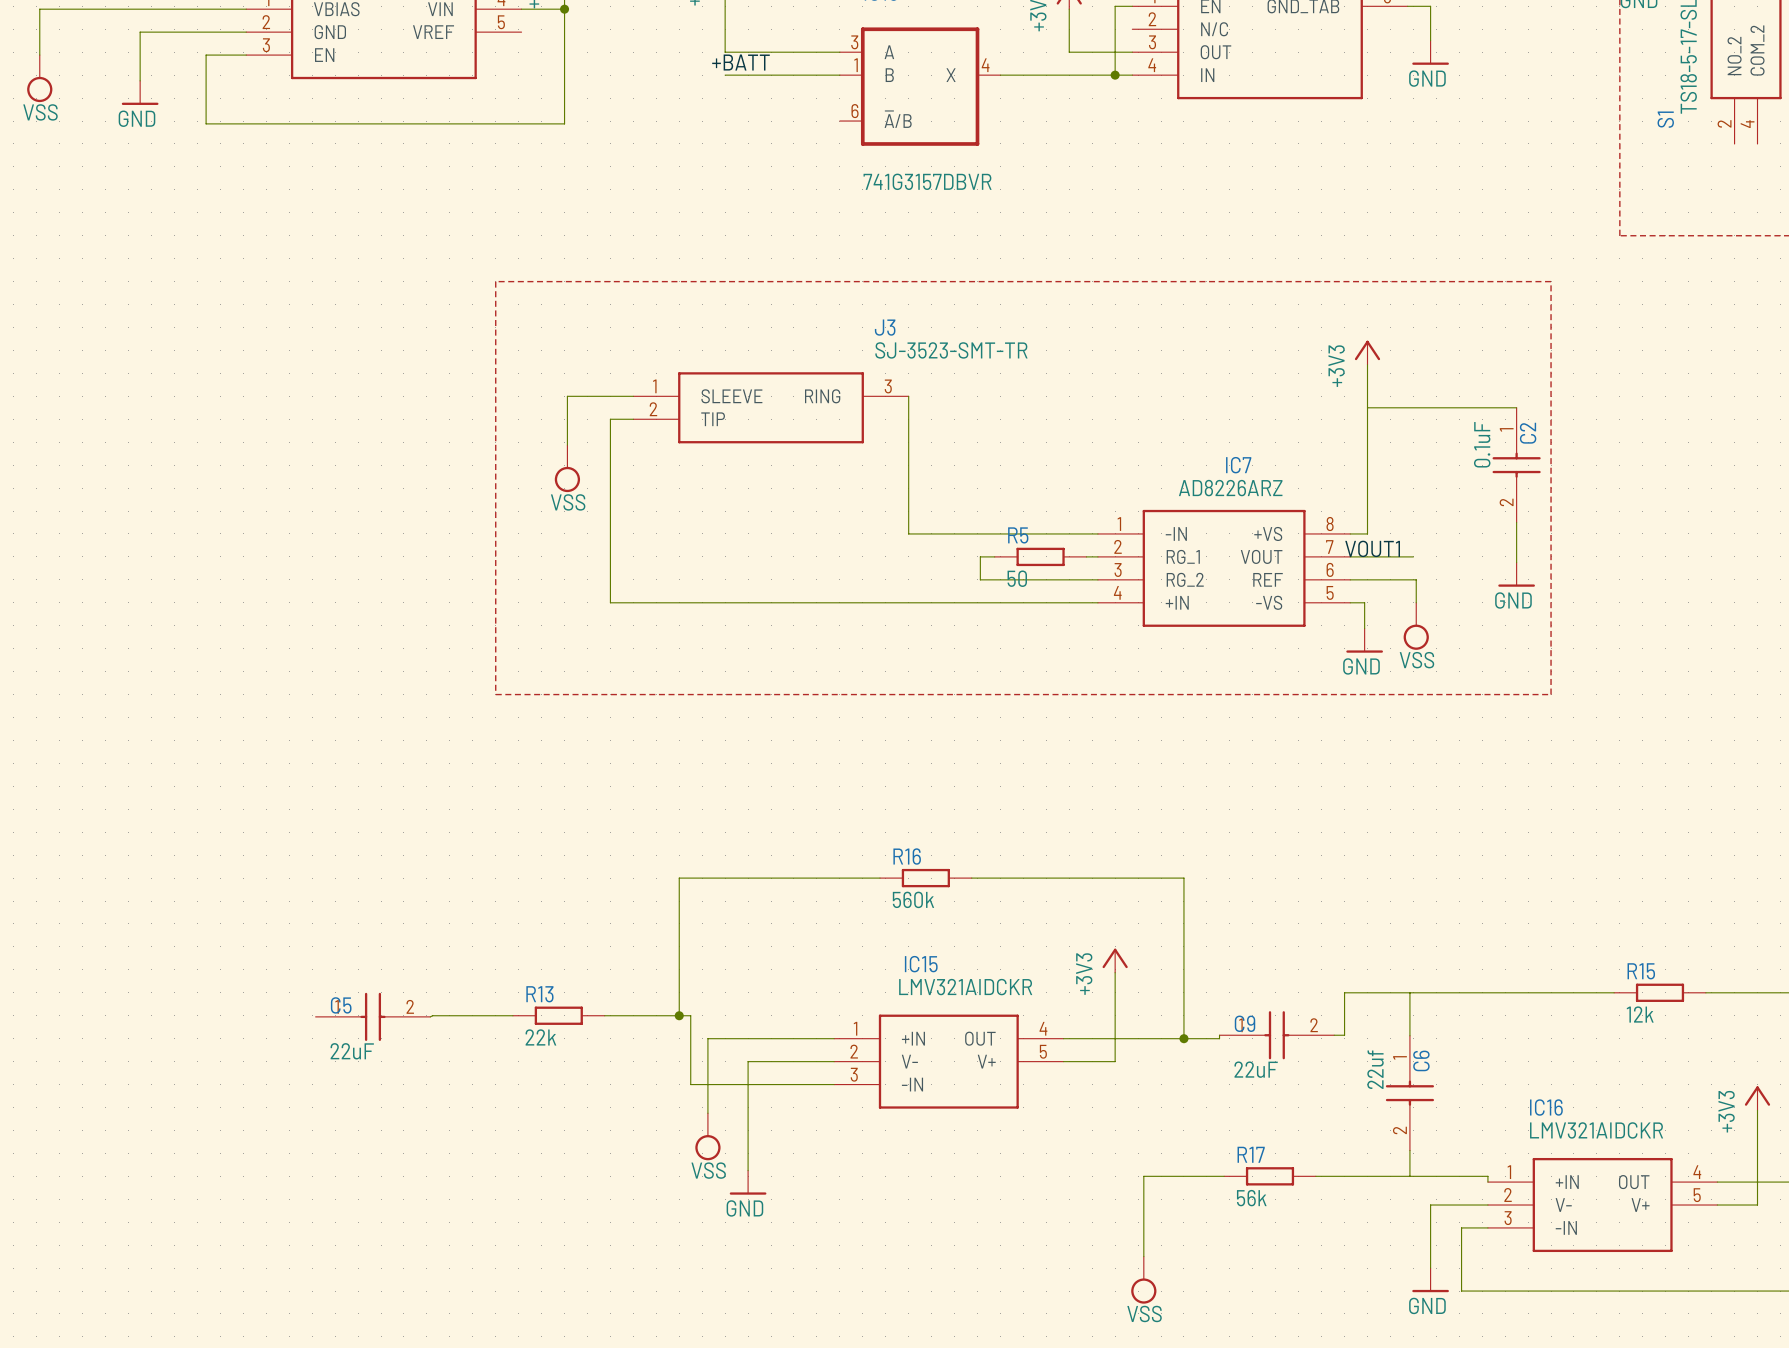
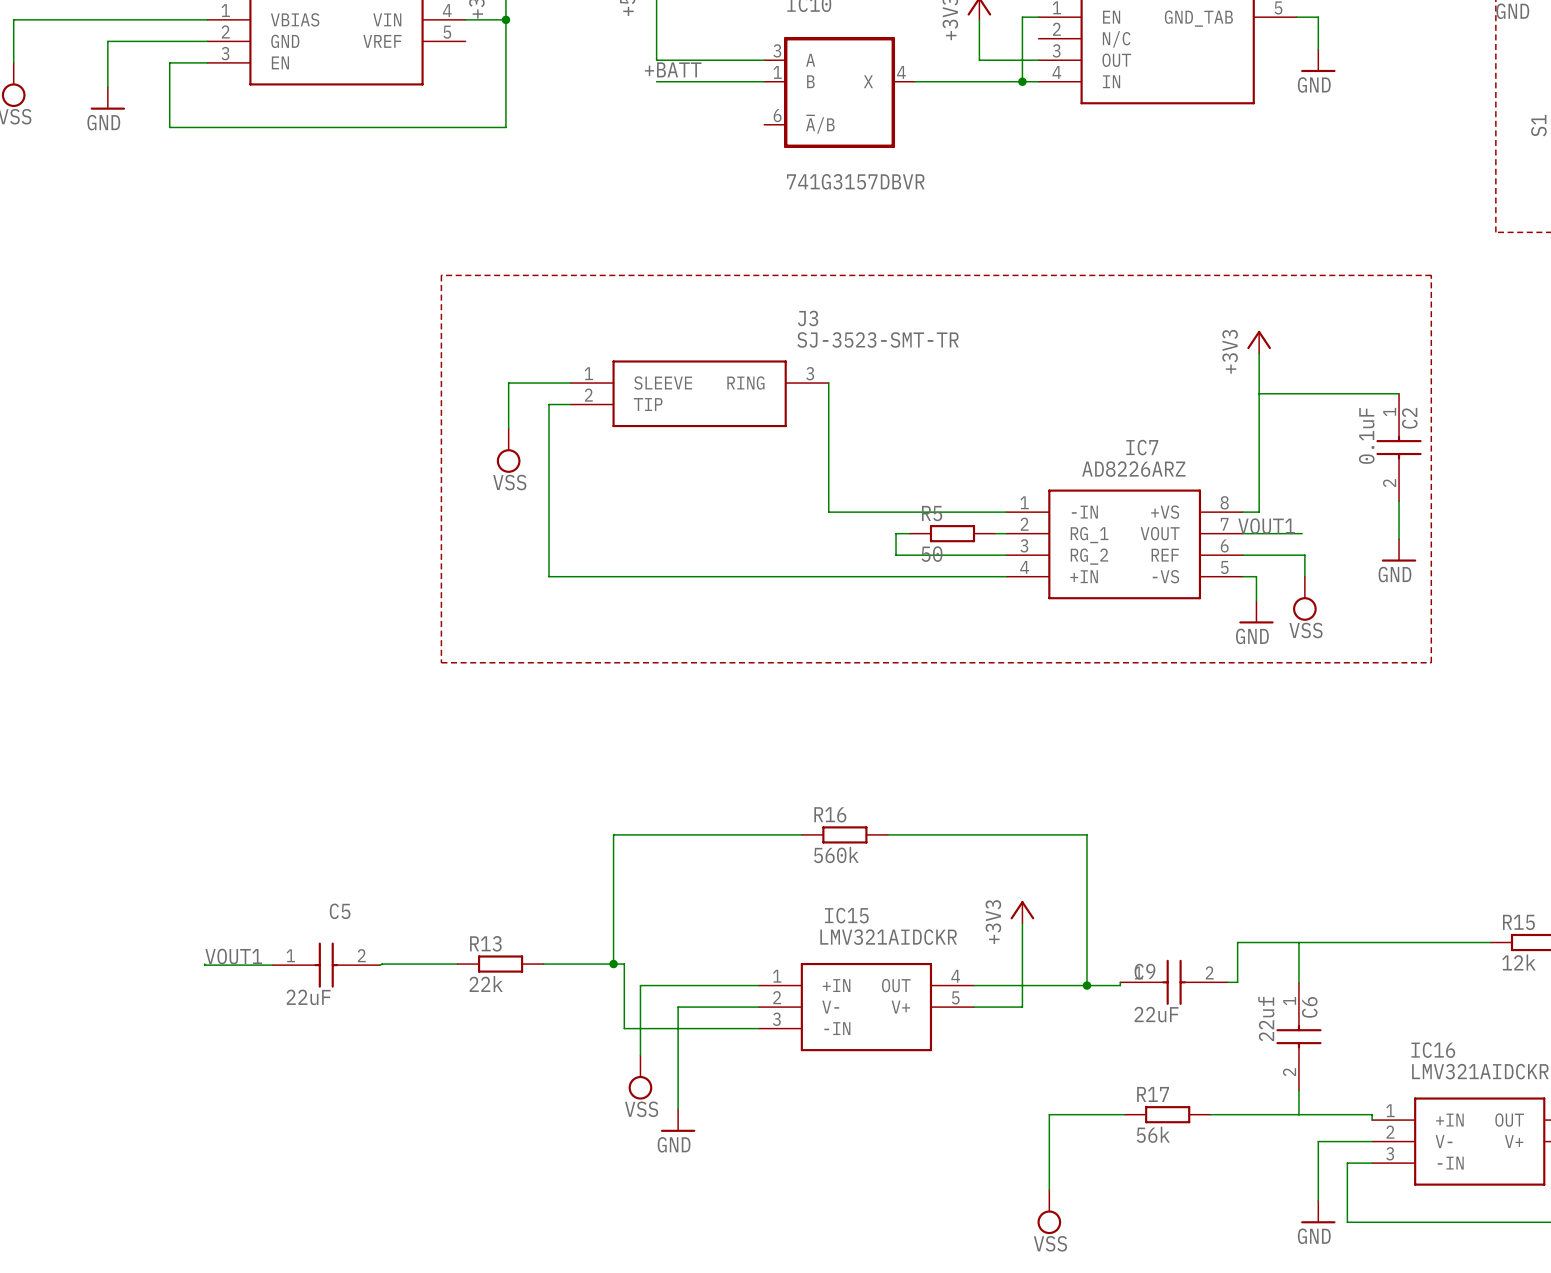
C5 name position: C5 (341, 1005) -> C5 (340, 911)
label: none -> VOUT1 (233, 956)
wire: none -> (204, 964) (272, 965)

